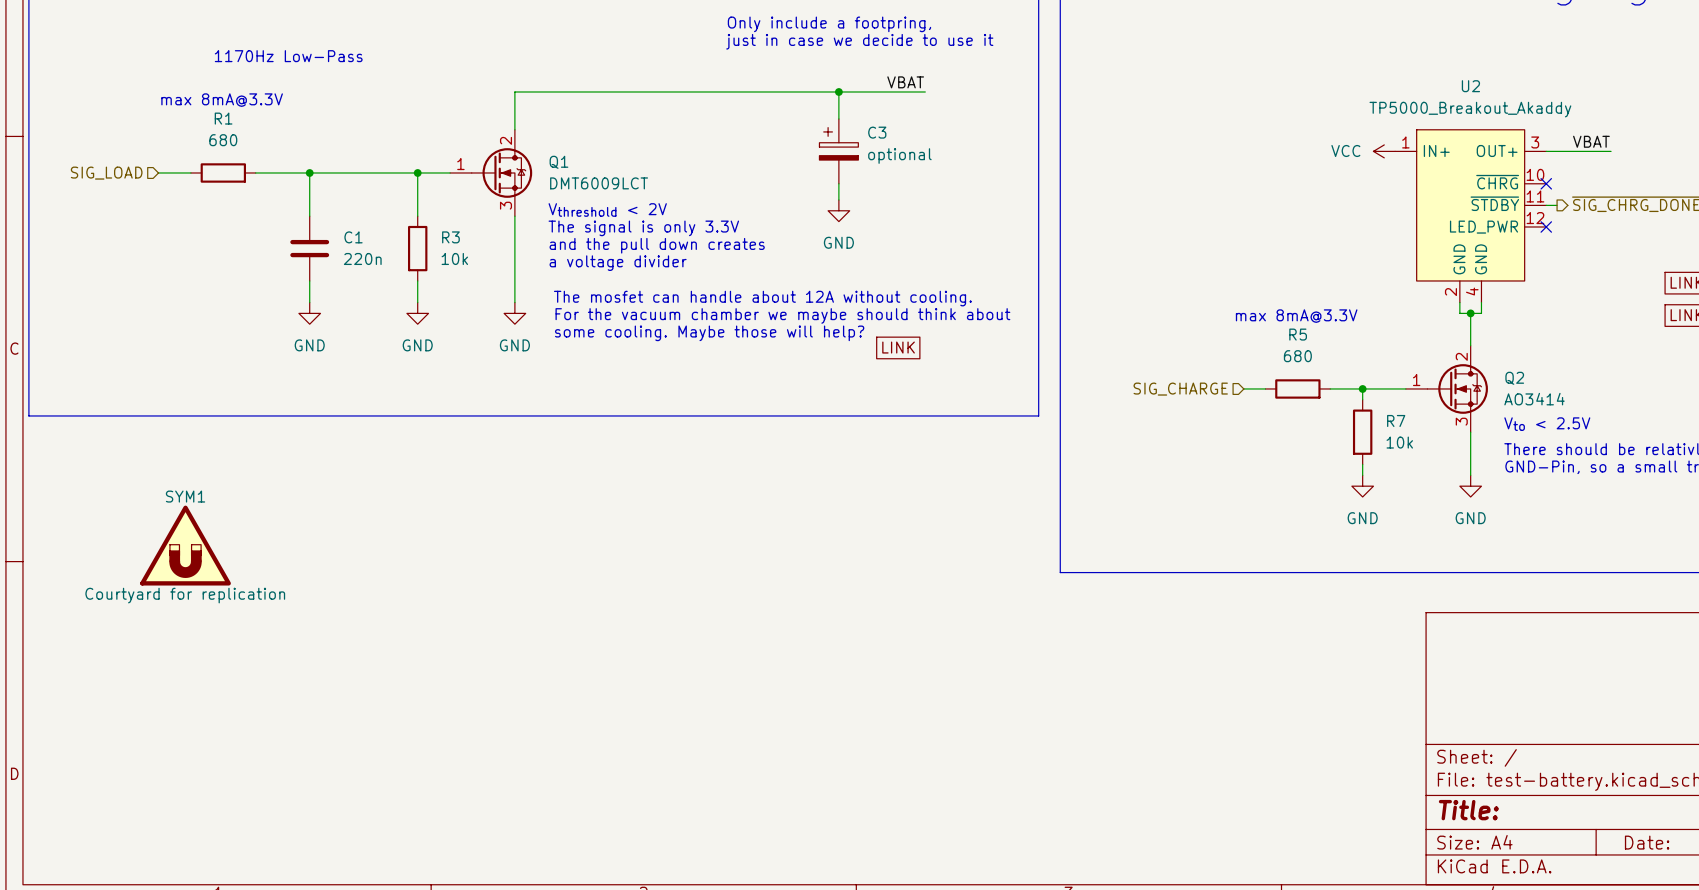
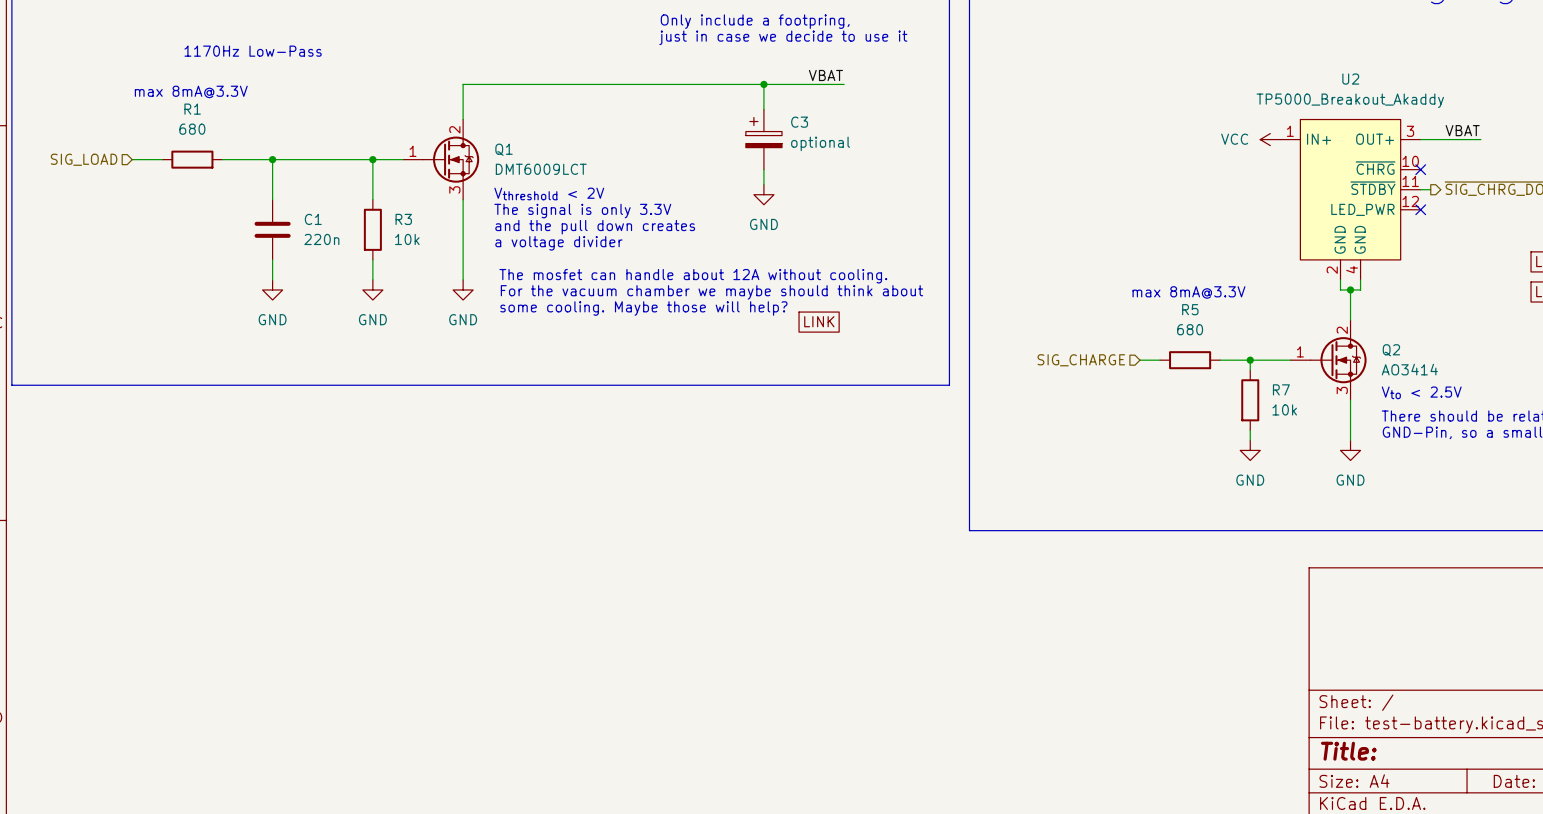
SYM1: Courtyard for replication (185, 545) -> none

